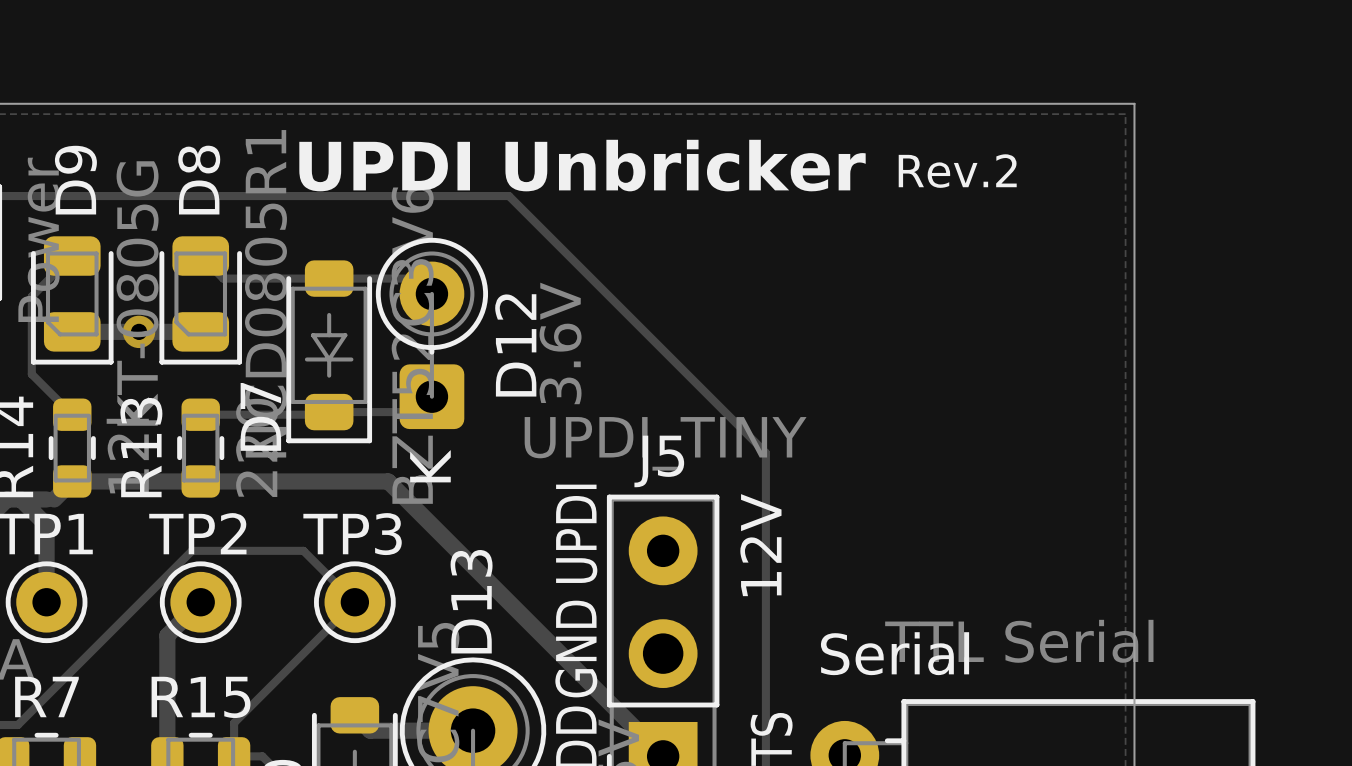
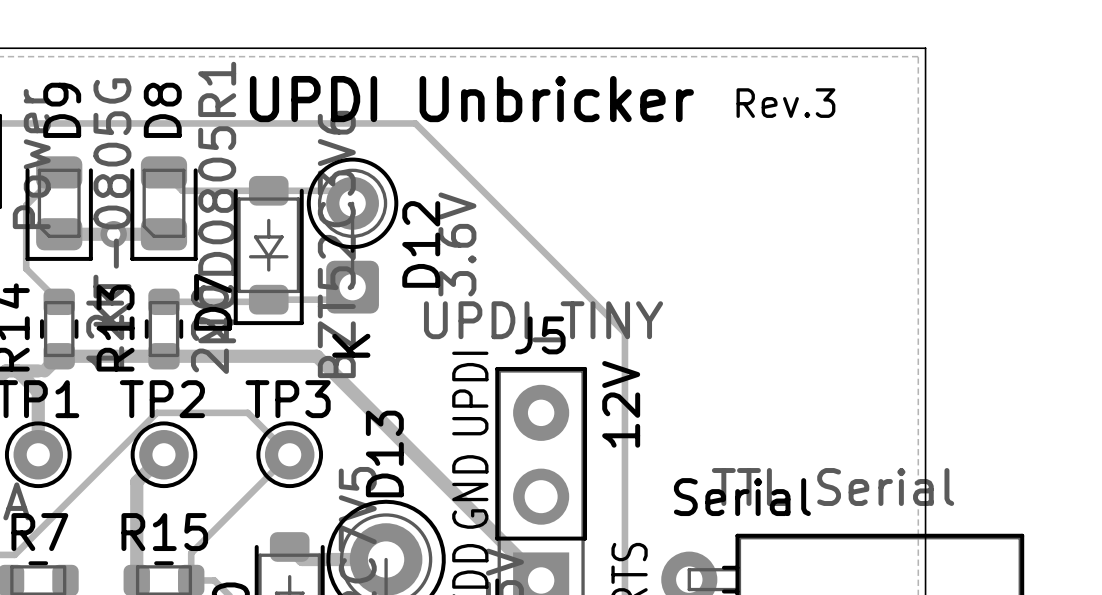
text: Rev.2 (957, 171) -> Rev.3 (785, 103)

